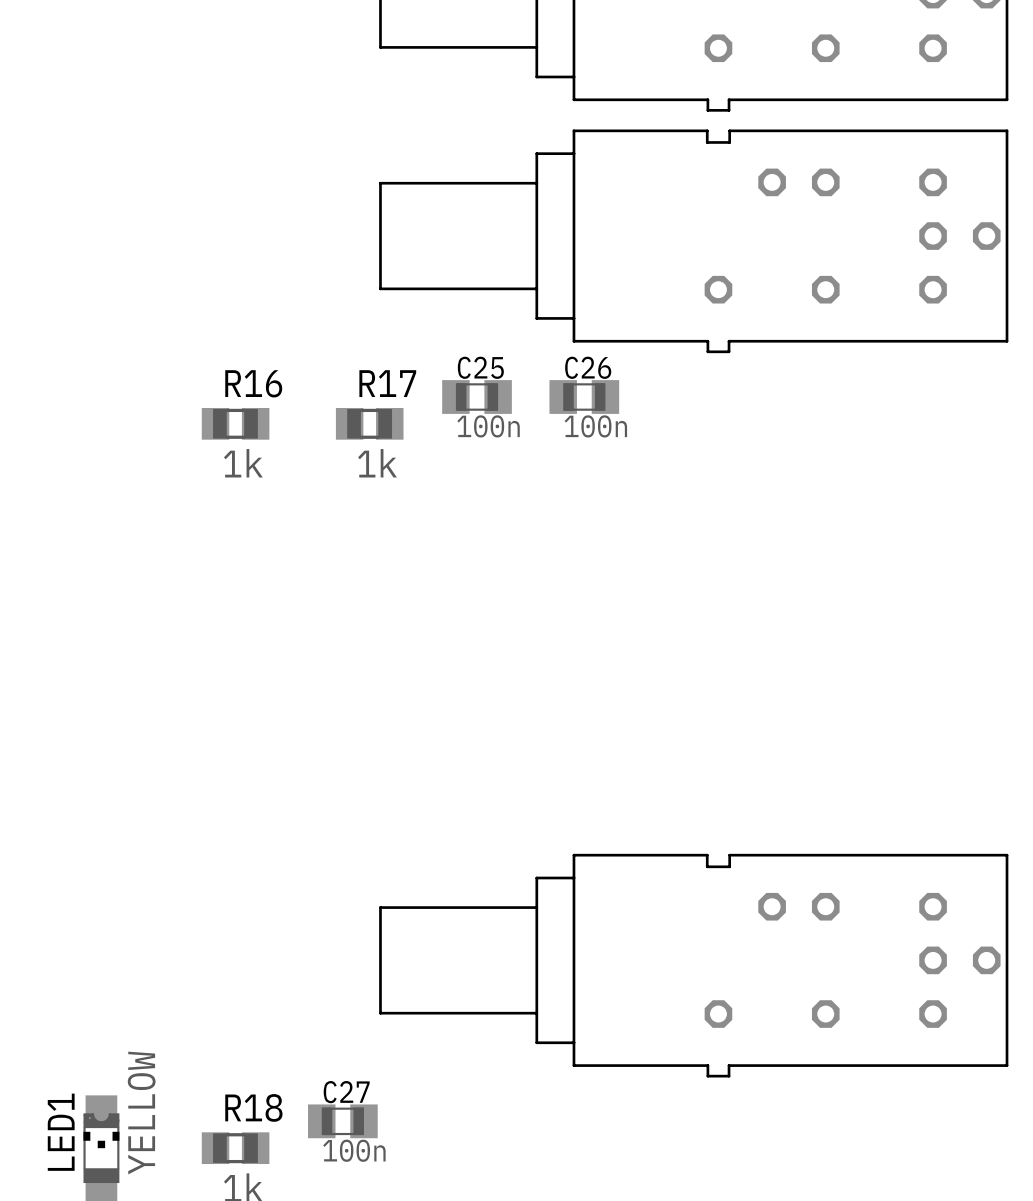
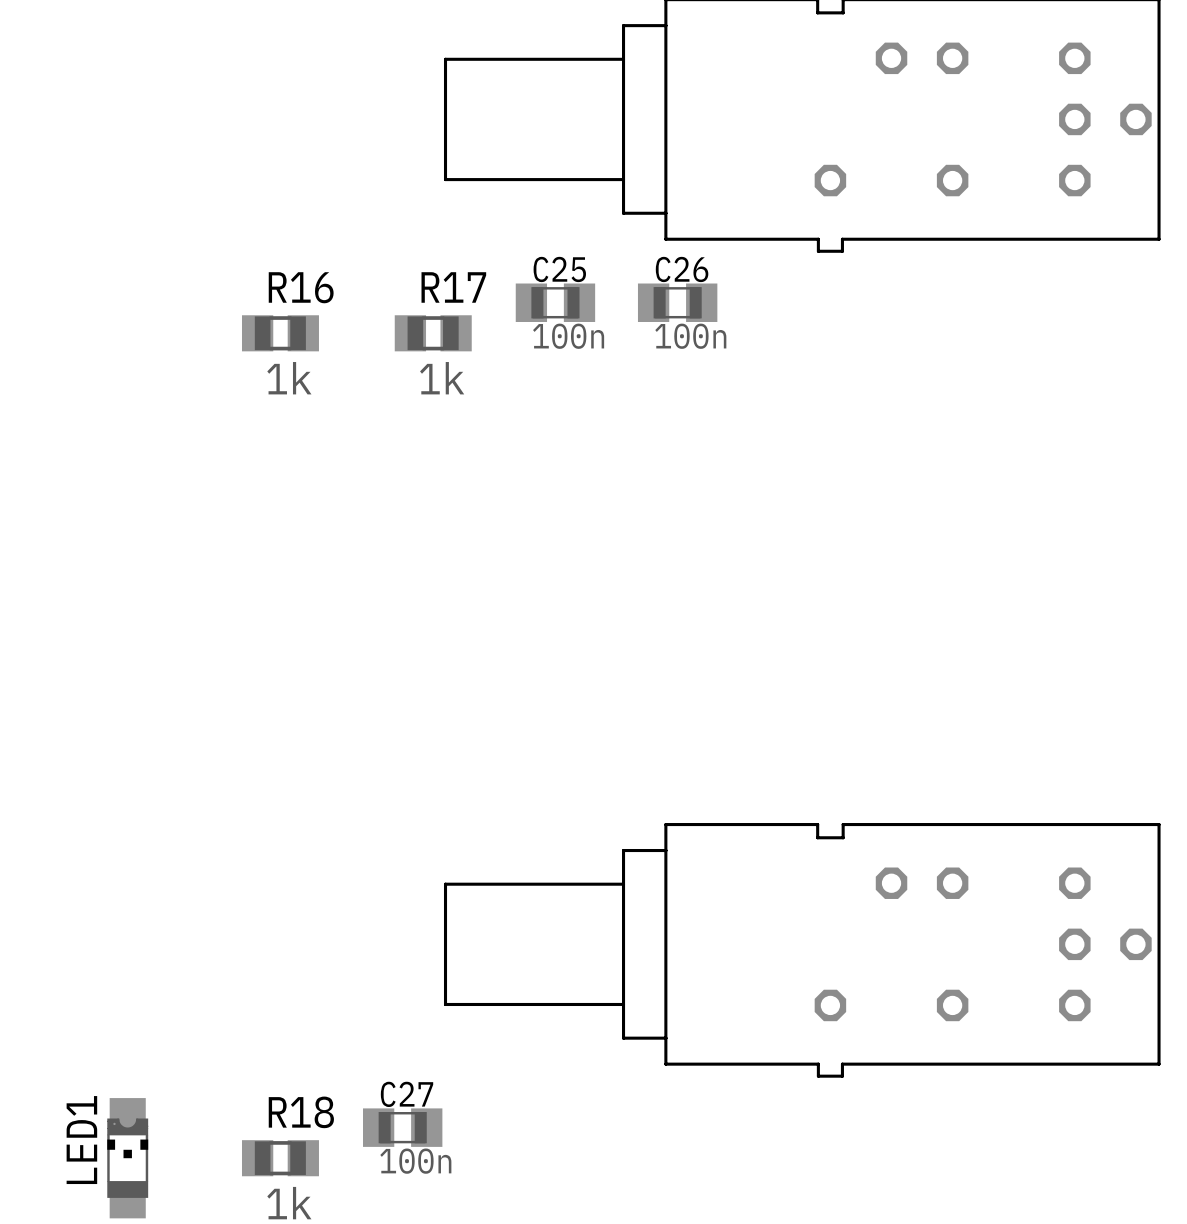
LED1 value: YELLOW (141, 1113) -> none

